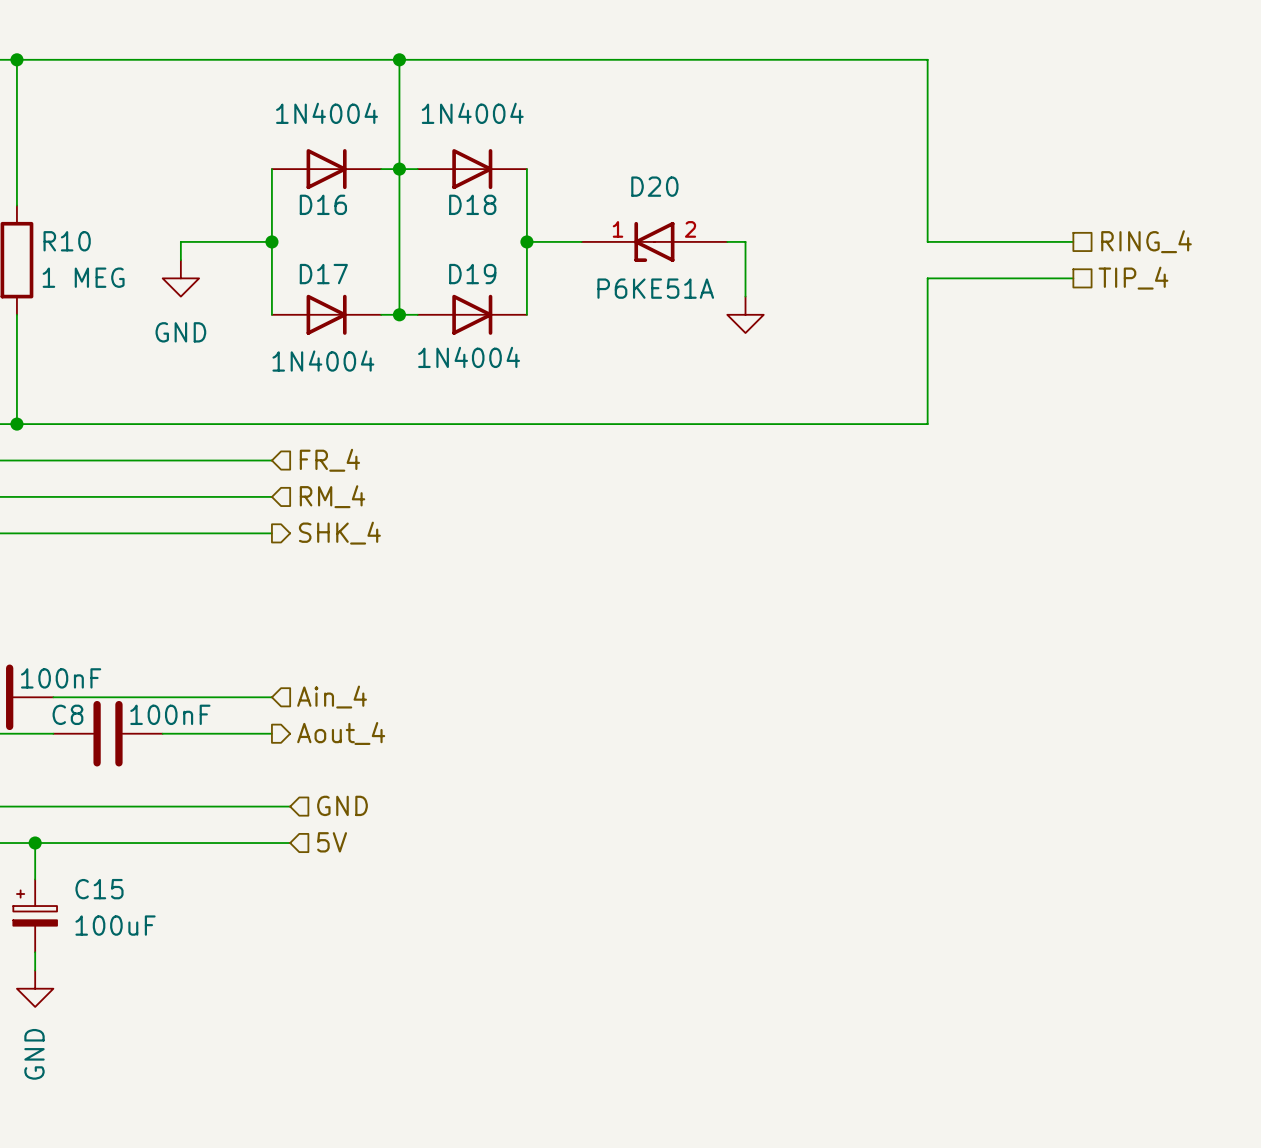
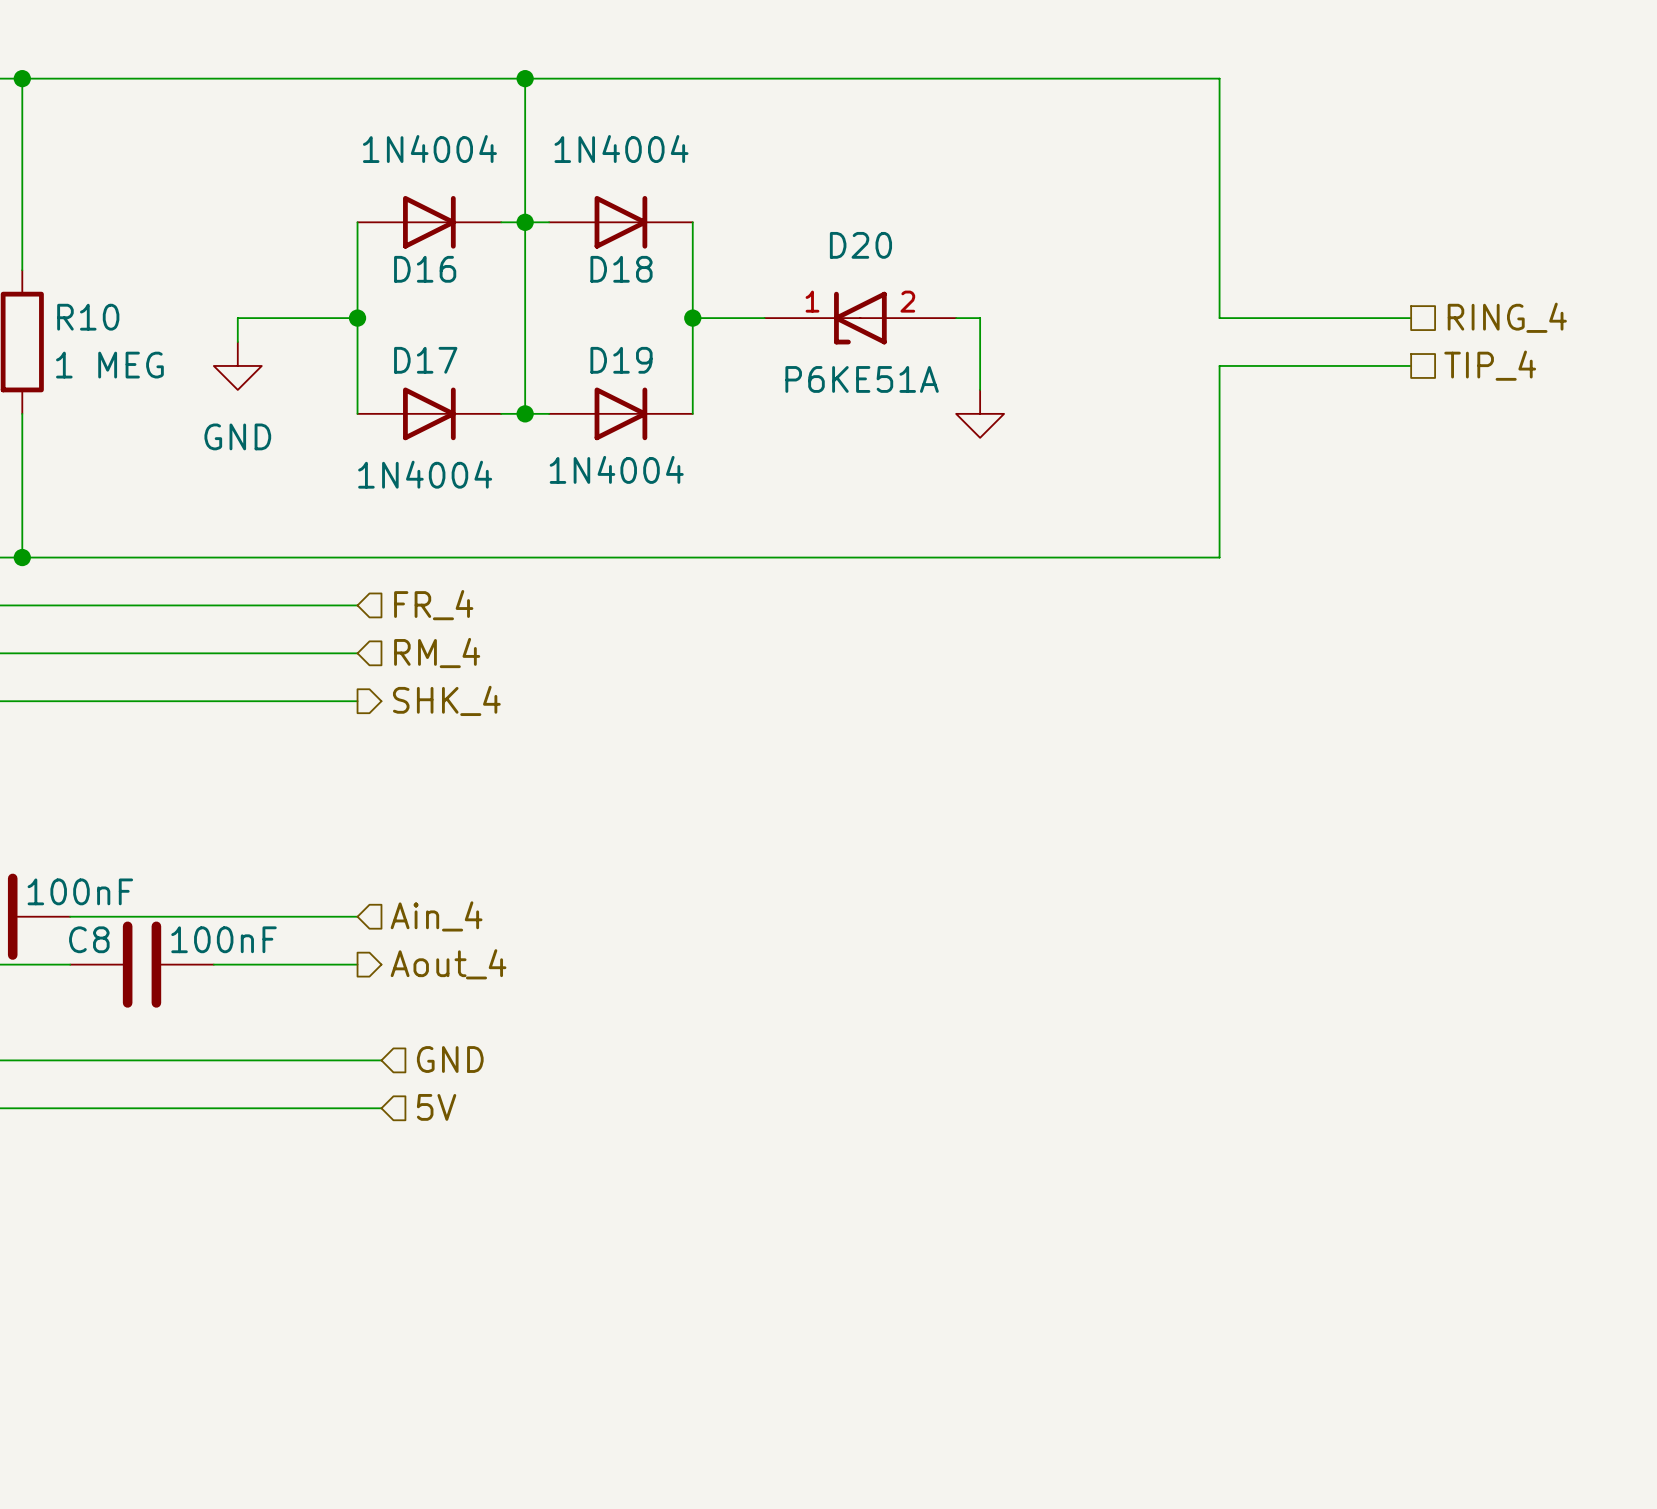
wire: (35, 843) (35, 879) -> none
junction: (35, 843) -> none
C15: 100uF (35, 915) -> none
wire: (35, 952) (35, 970) -> none
power symbol: GND (35, 988) -> none

